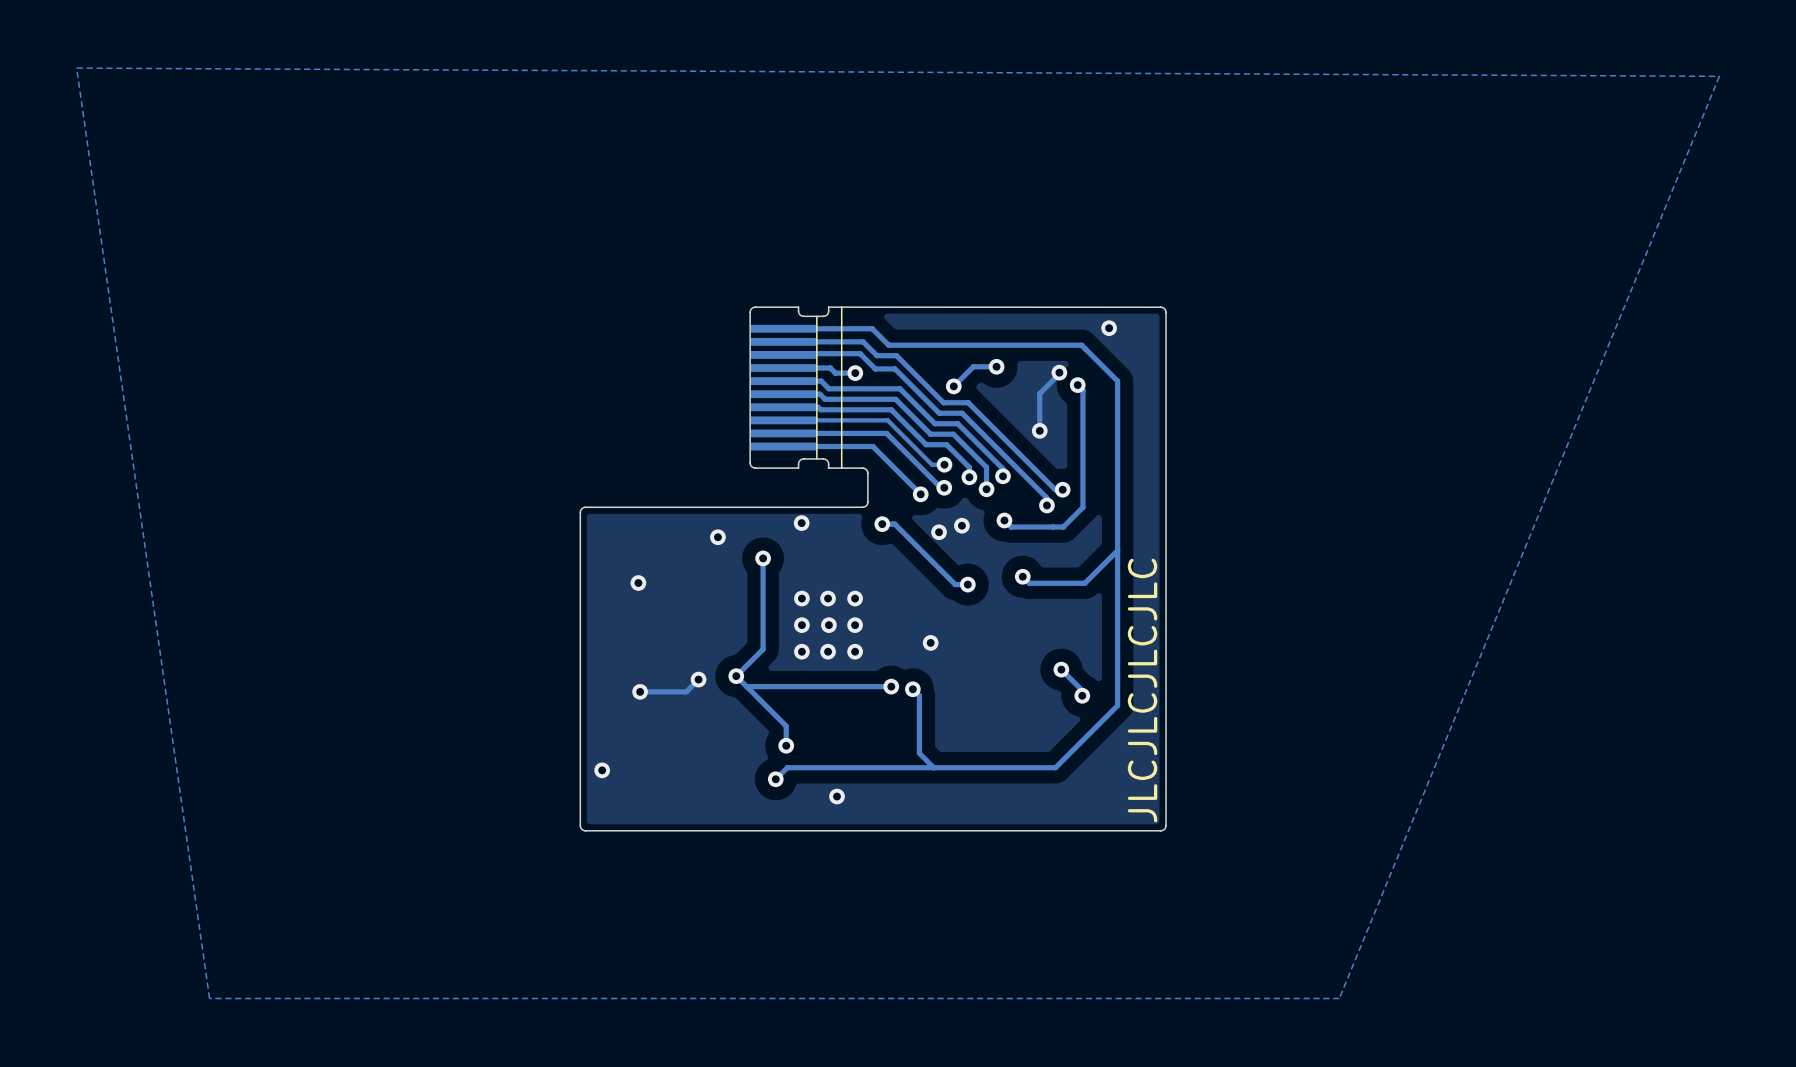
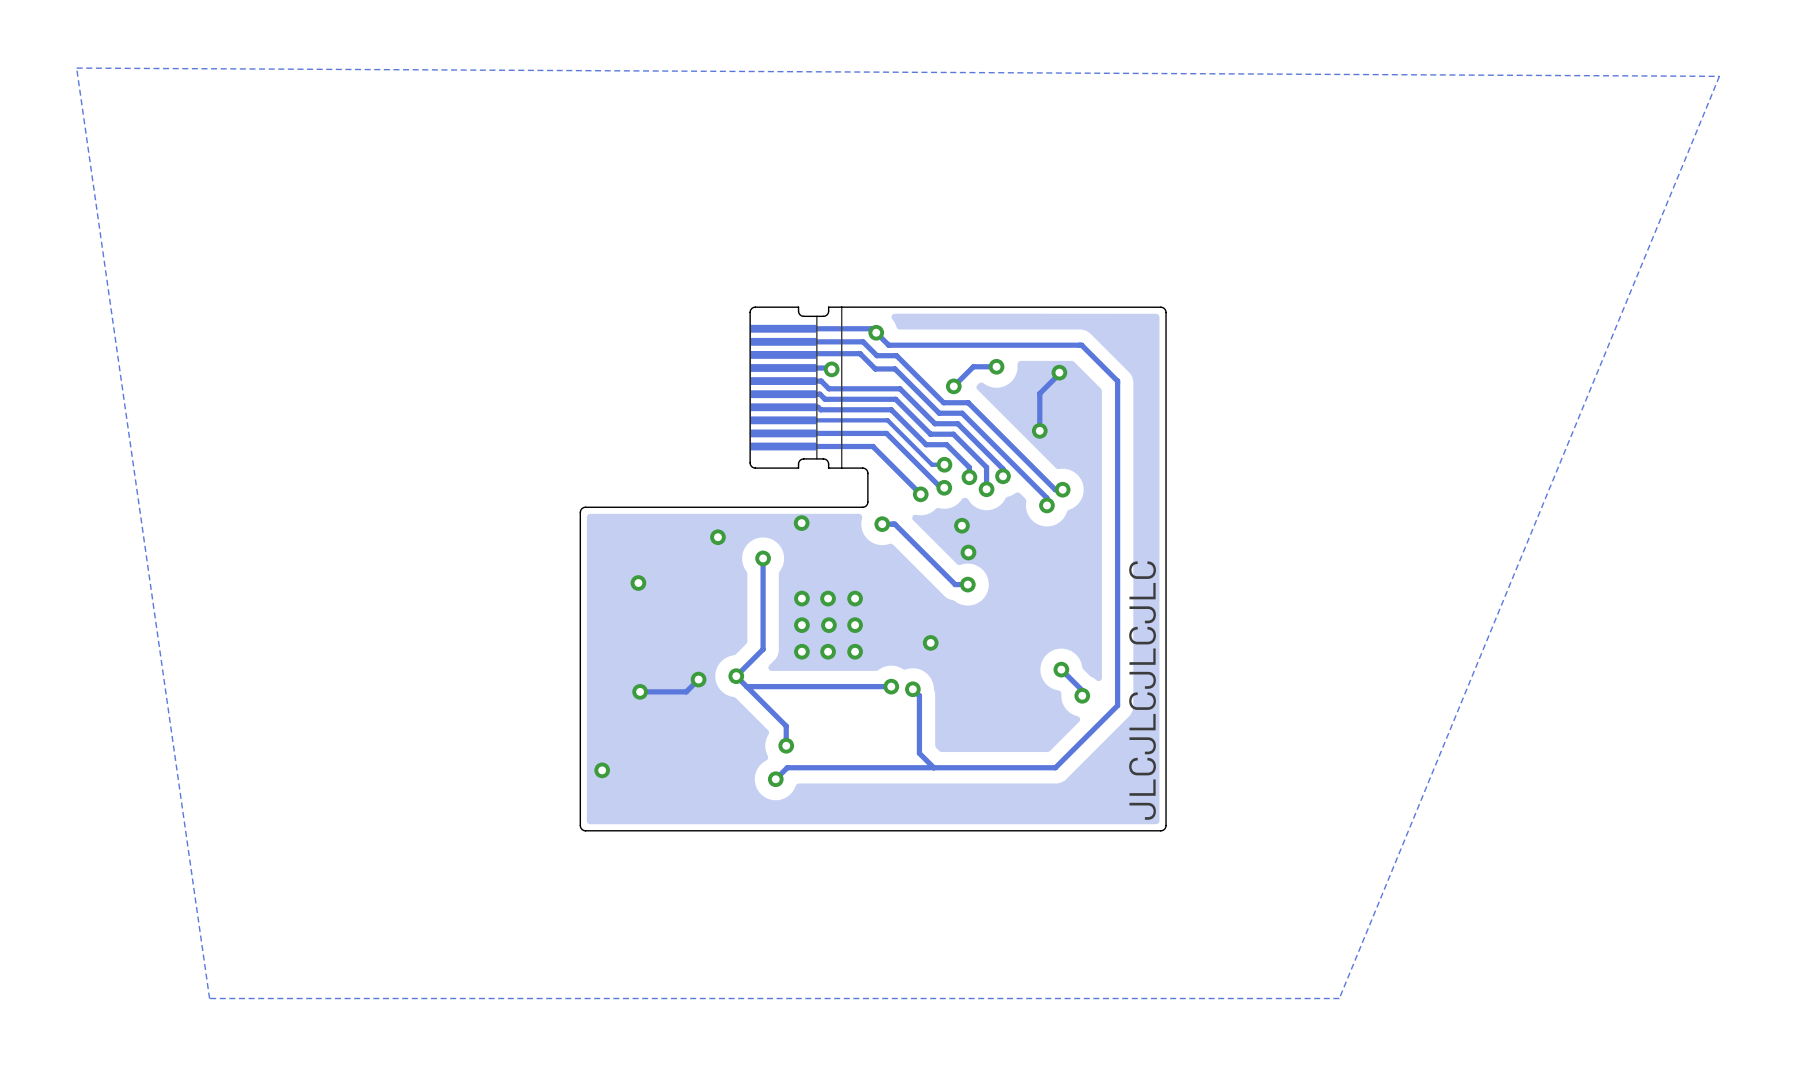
via: (1109, 328) -> none
via: none -> (876, 332)
track: (831, 369) (835, 373) (855, 373) -> none
via: none -> (831, 369)
via: (855, 373) -> none
track: (1077, 385) (1082, 390) (1082, 507) (1063, 527) (1011, 527) (1004, 520) -> none
via: (1077, 385) -> none
via: (1004, 520) -> none
via: (939, 532) -> none
track: (1117, 550) (1084, 583) (1029, 583) (1022, 576) -> none
via: none -> (968, 552)
via: (1022, 576) -> none
via: (837, 796) -> none

